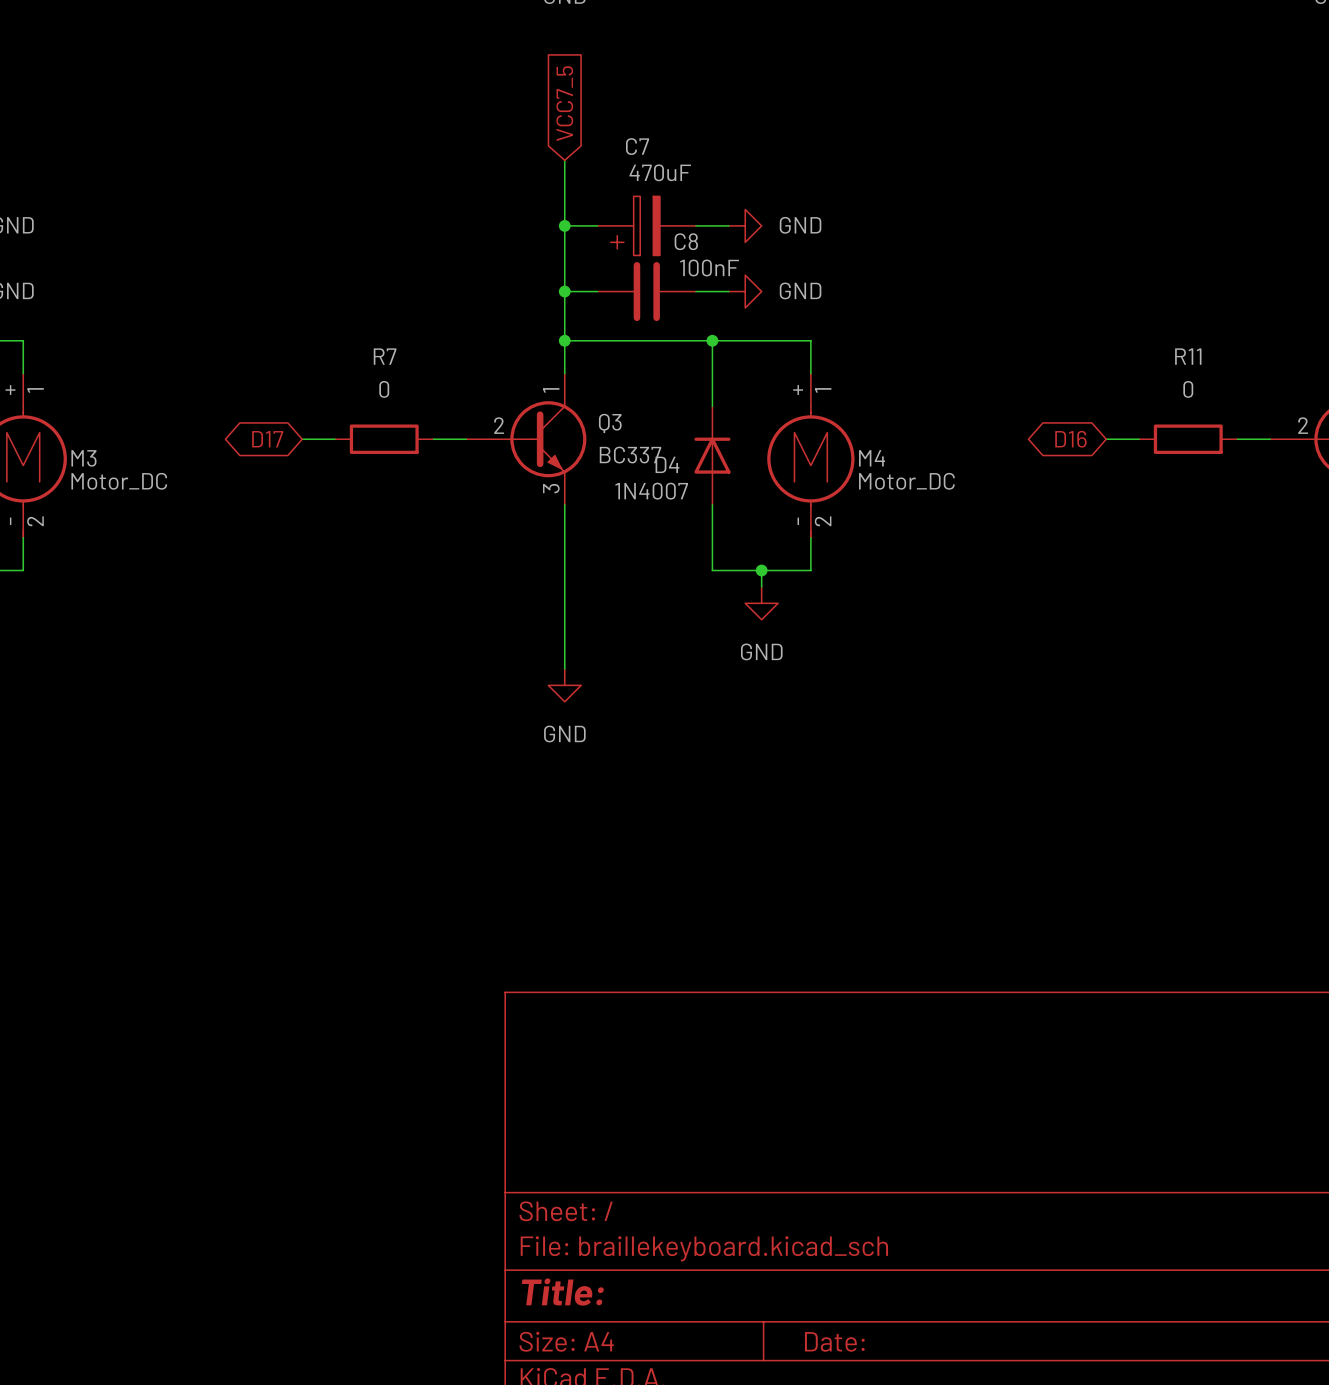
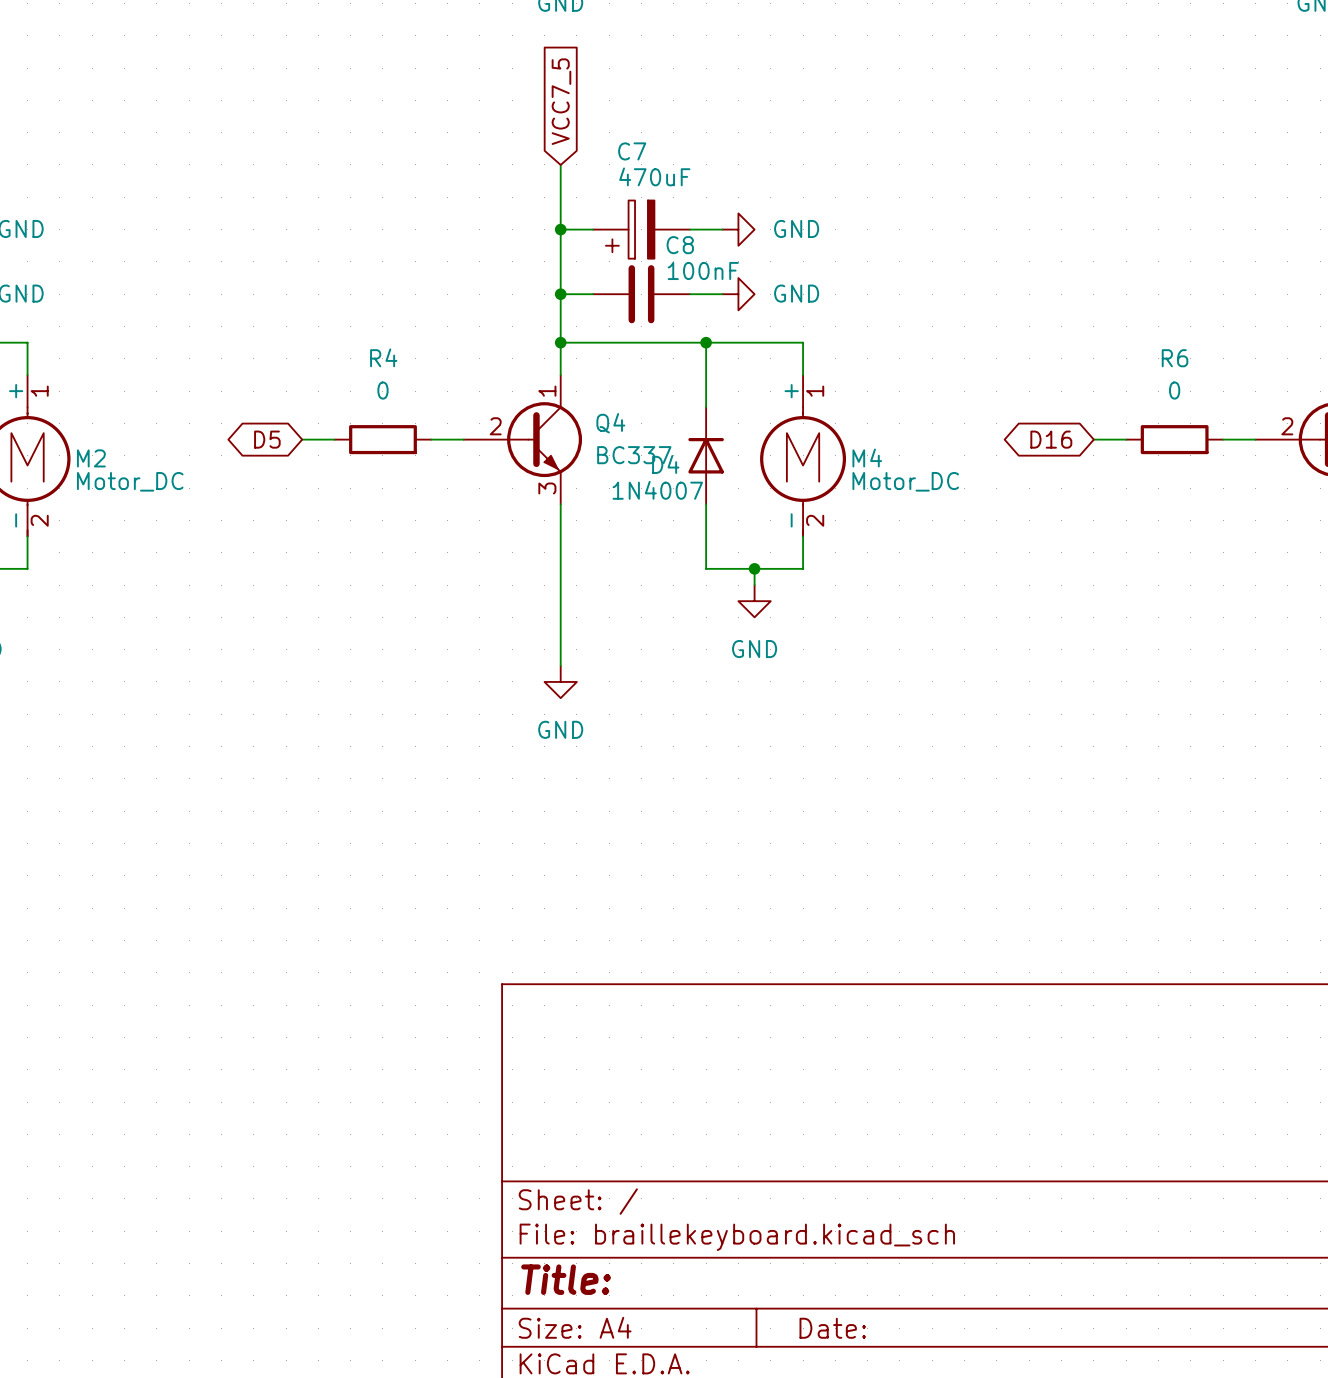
R7 name: R7 (385, 356) -> R4 (383, 357)
R11 name: R11 (1188, 356) -> R6 (1175, 358)
Q3 name: Q3 (610, 423) -> Q4 (610, 423)
global label: D17 (267, 439) -> D5 (267, 439)
M3 name: M3 (83, 458) -> M2 (91, 458)

